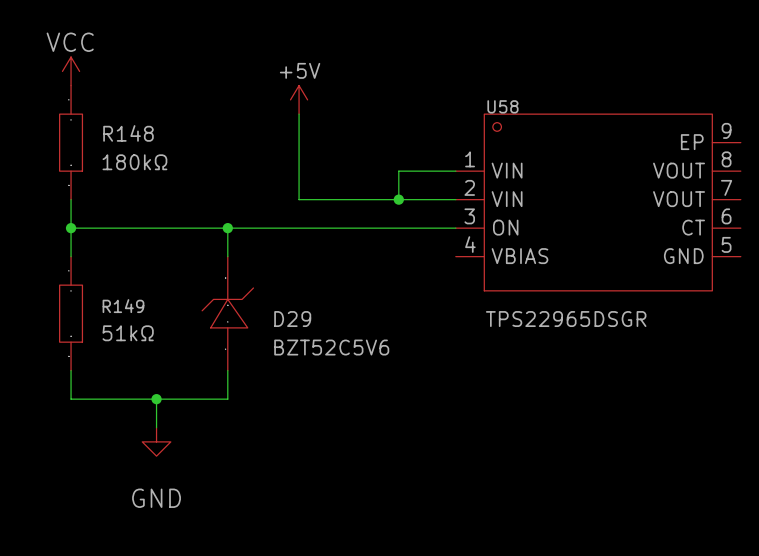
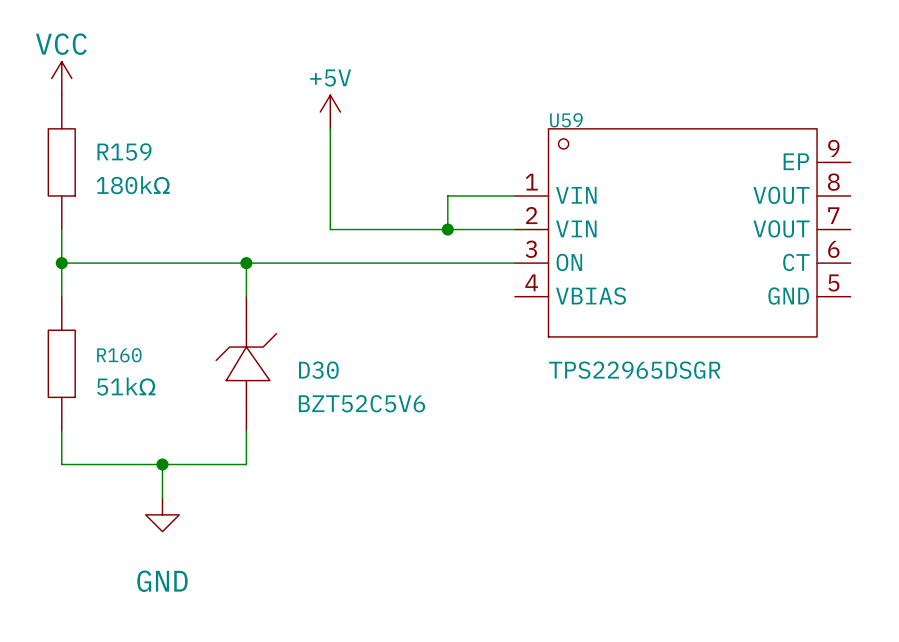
U58 name: U58 (502, 106) -> U59 (566, 120)
R148 name: R148 (128, 133) -> R159 (124, 151)
R149 name: R149 (123, 306) -> R160 (119, 355)
D29 name: D29 (292, 319) -> D30 (318, 370)

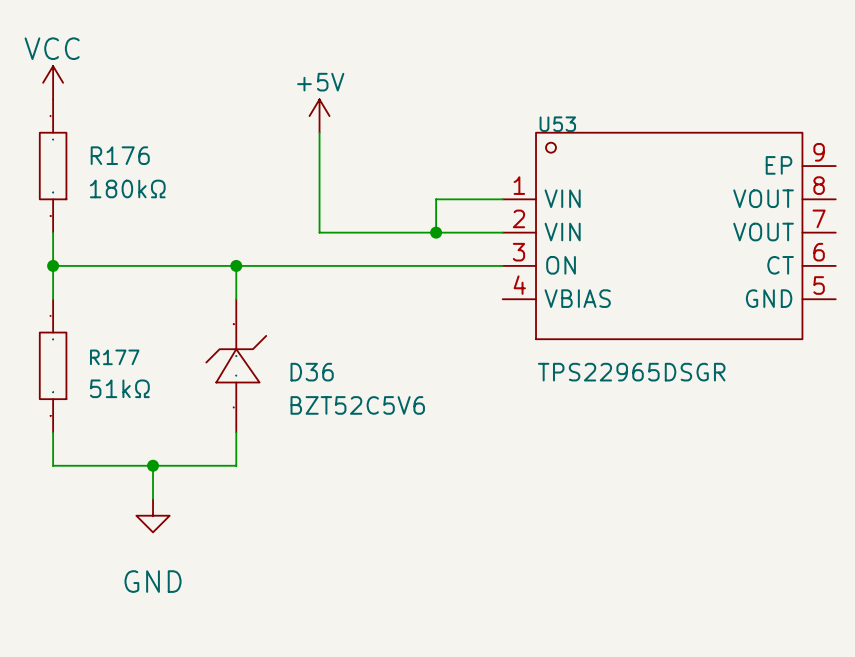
U59 name: U59 (566, 120) -> U53 (557, 124)
R159 name: R159 (124, 151) -> R176 (120, 155)
R160 name: R160 (119, 355) -> R177 (114, 357)
D30 name: D30 (318, 370) -> D36 (312, 372)

